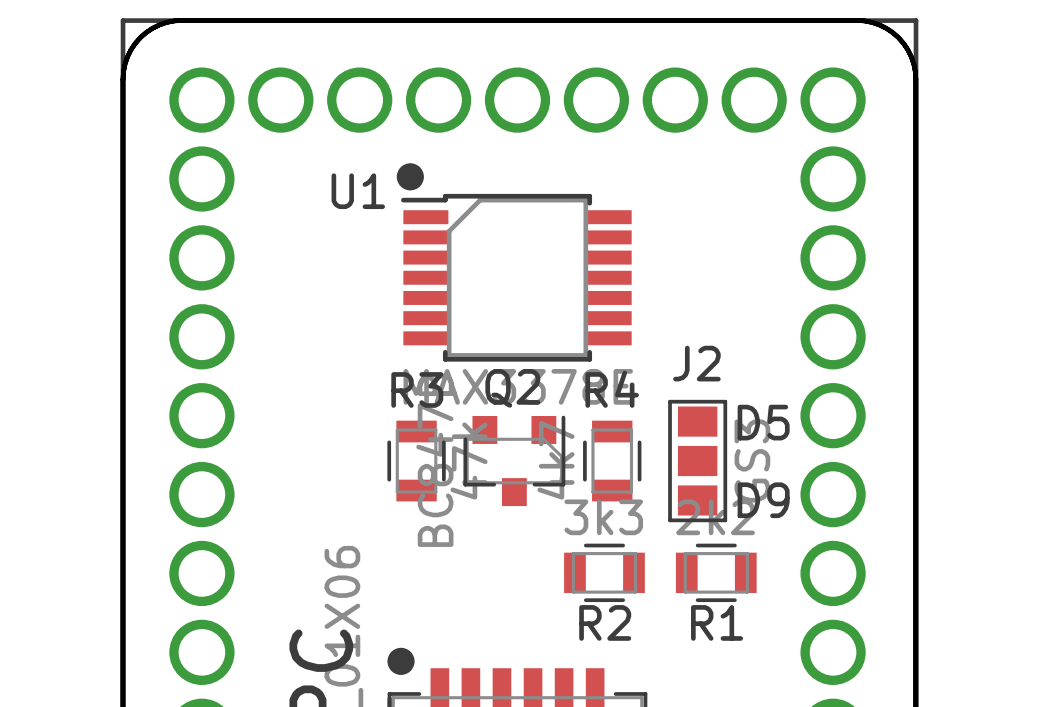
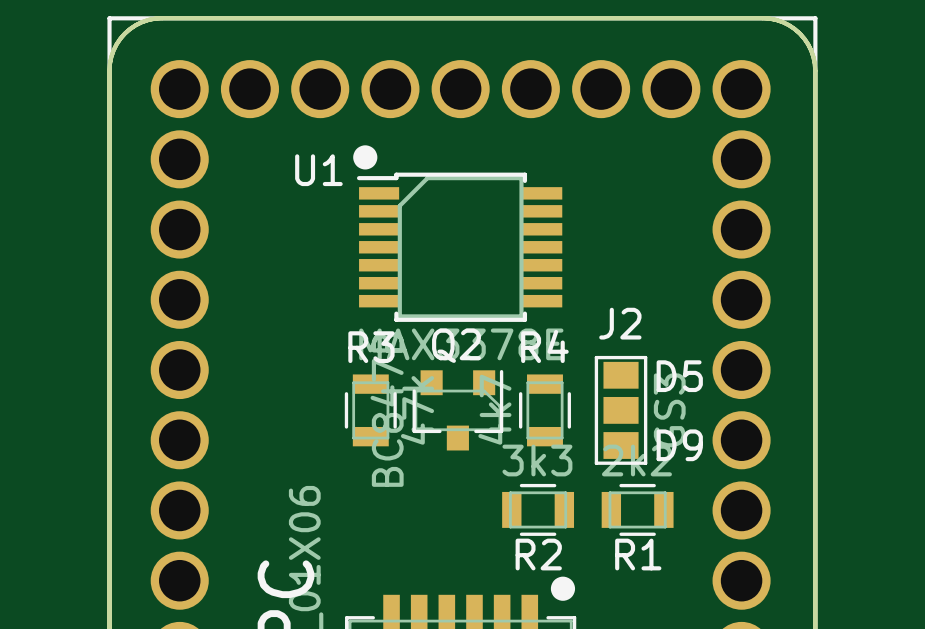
drawing position: (401, 661) -> (562, 588)

